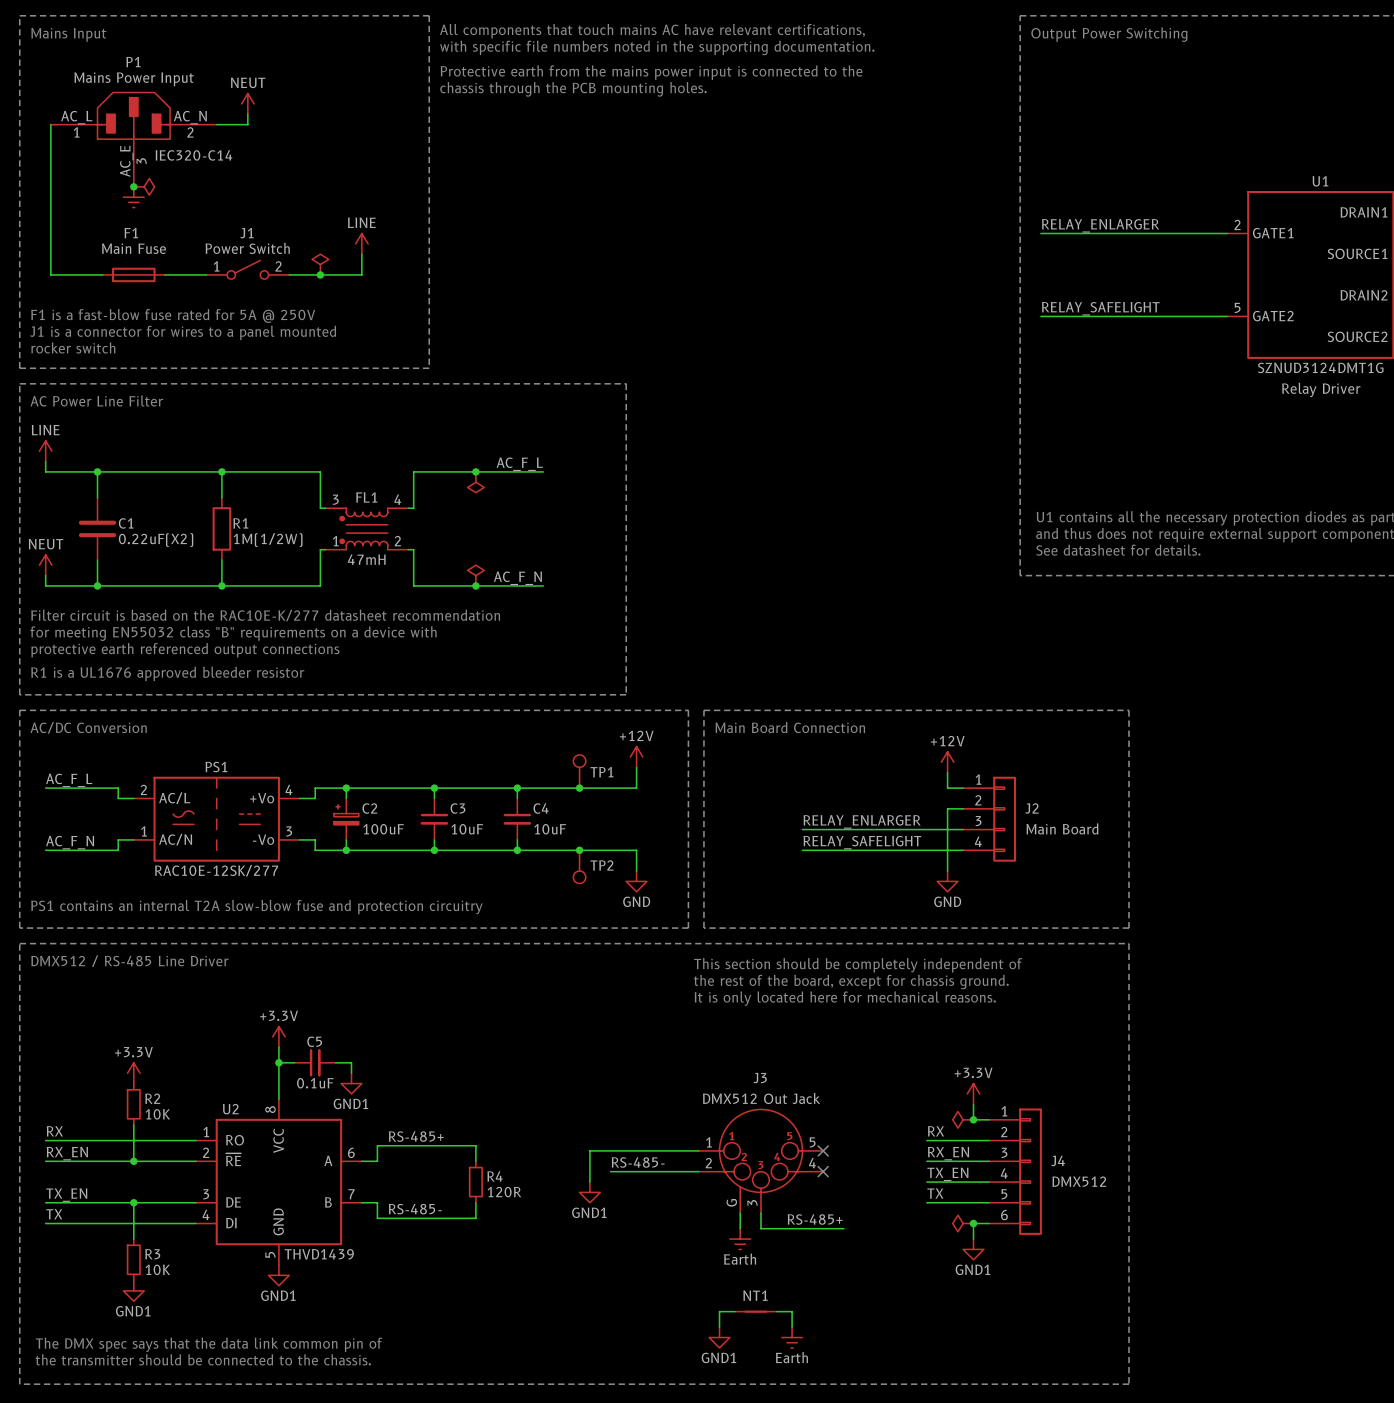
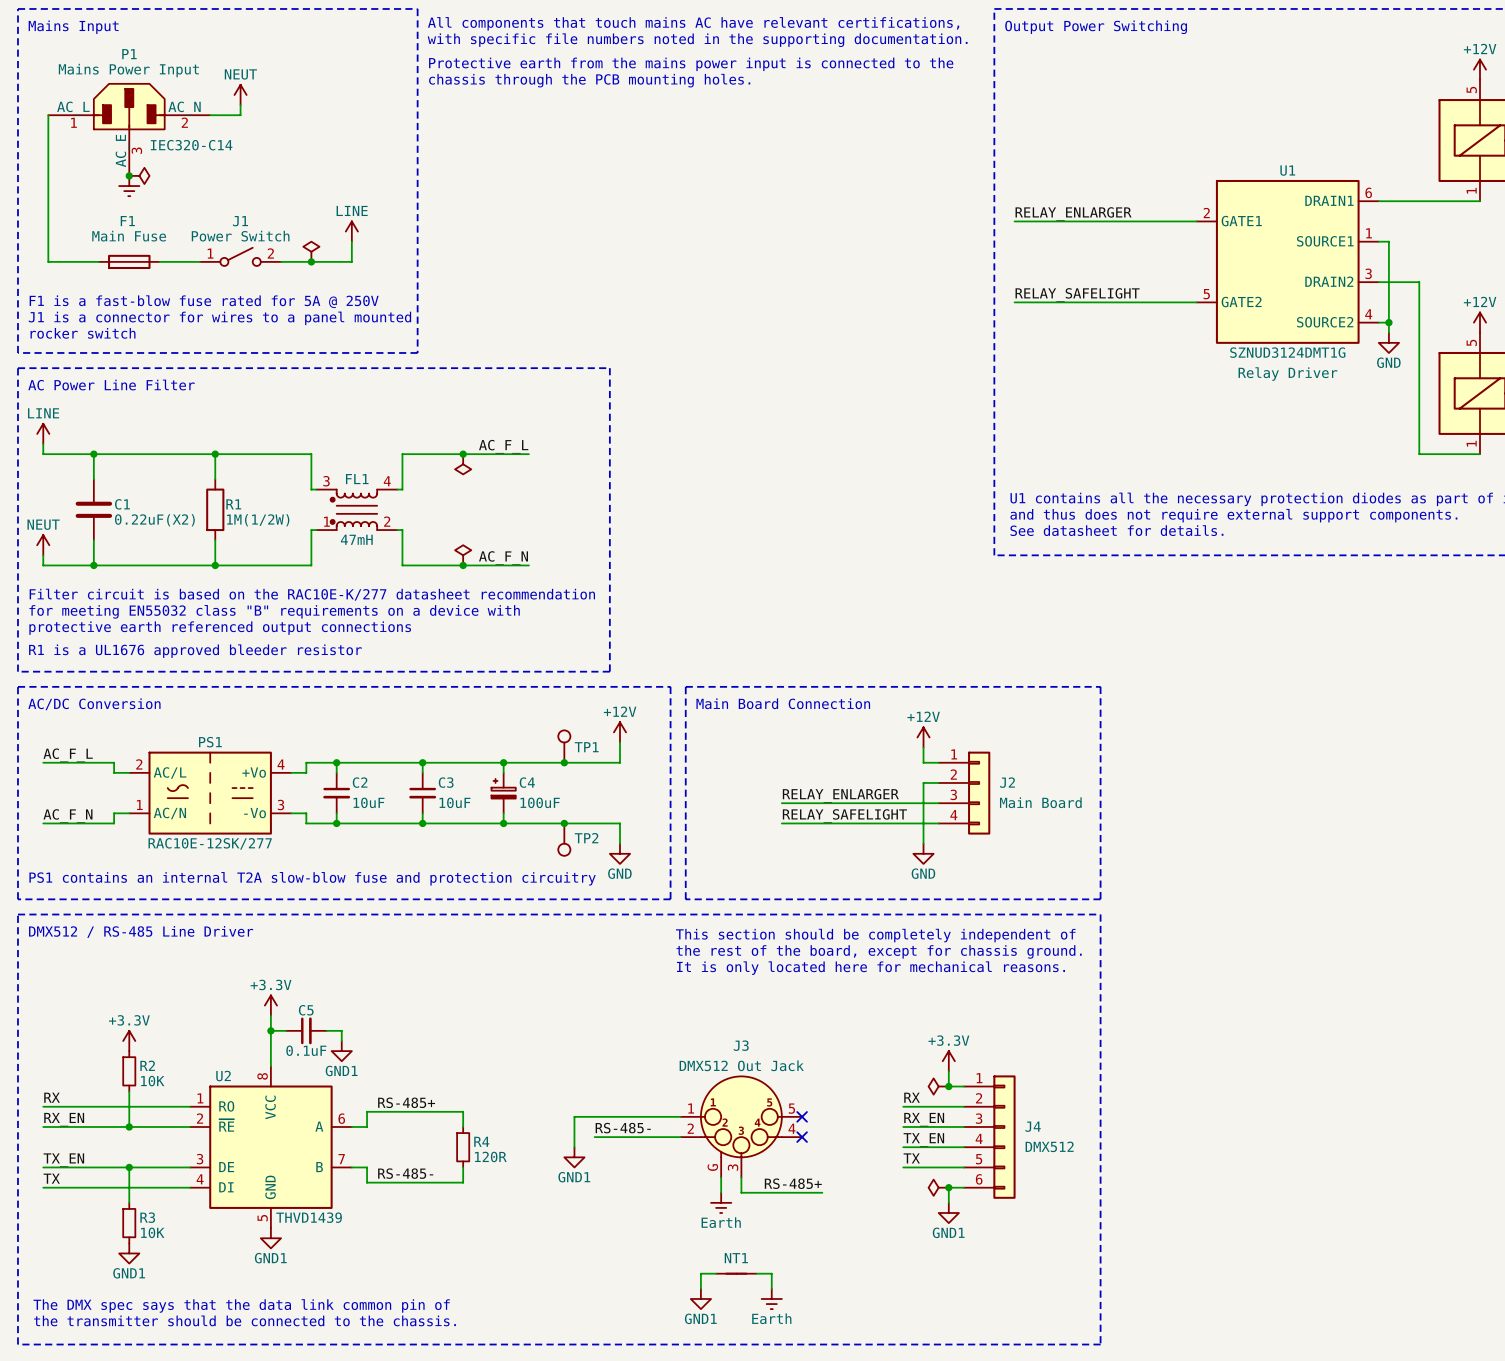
C2 symbol: [333, 798, 359, 840] -> [323, 772, 351, 814]
C4 symbol: [503, 798, 532, 840] -> [491, 772, 516, 814]
C2 value: 100uF (383, 829) -> 10uF (369, 802)
C4 value: 10uF (550, 829) -> 100uF (540, 802)

